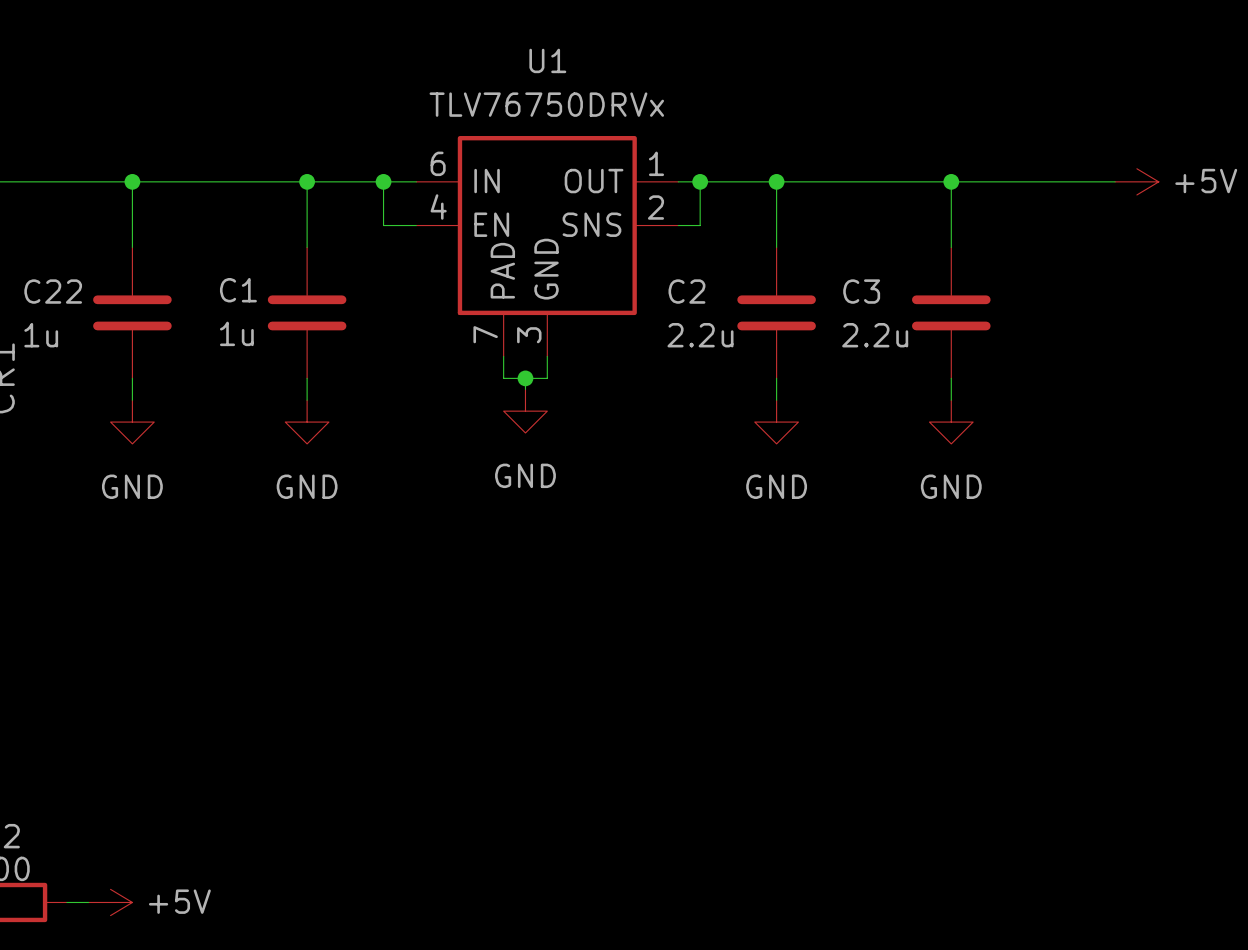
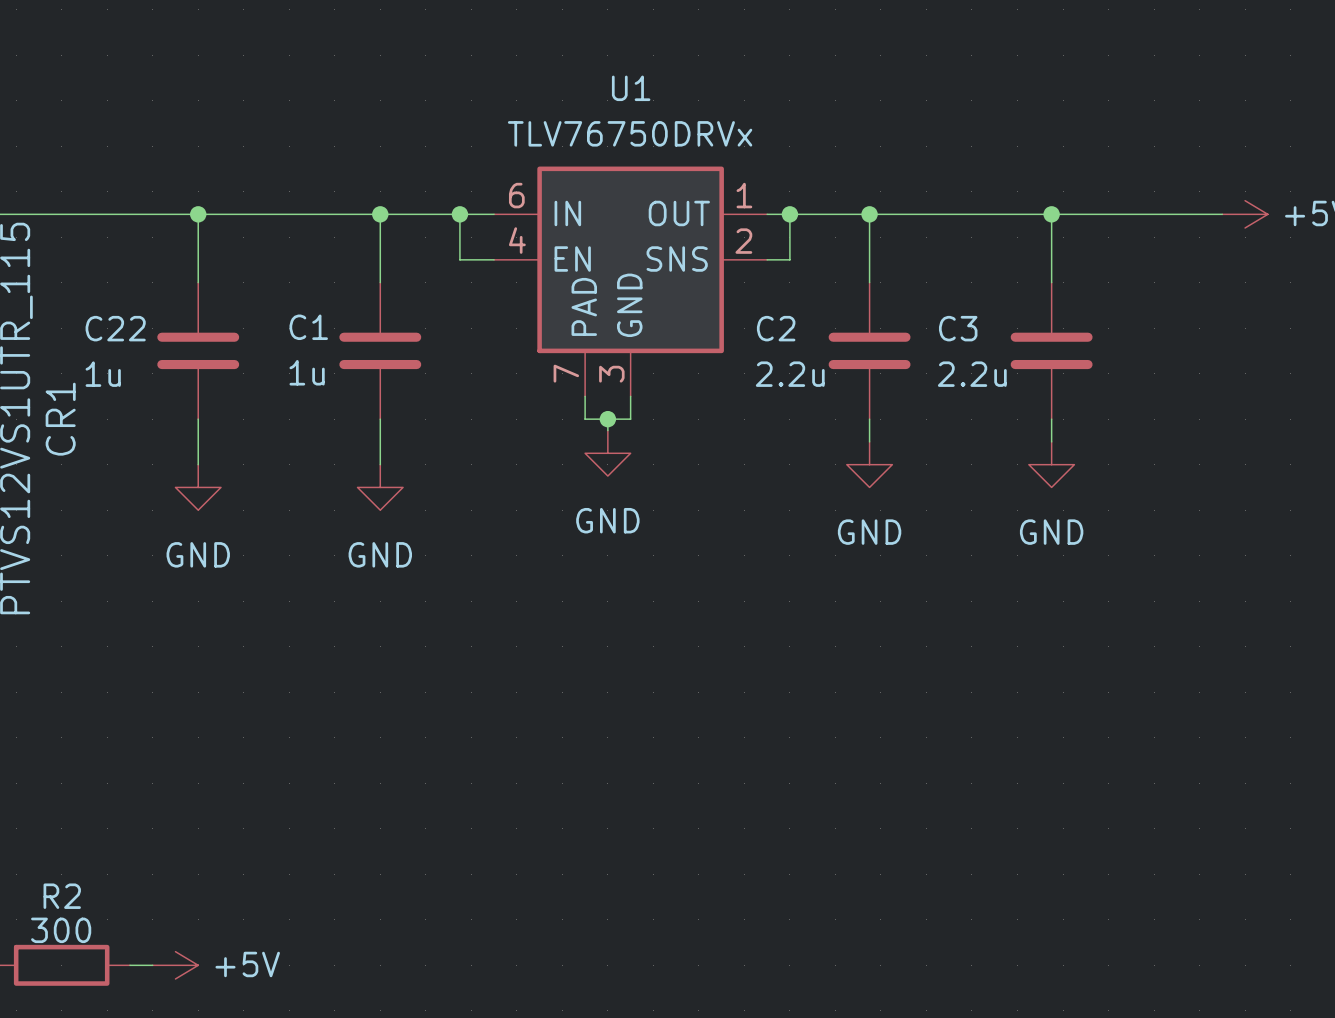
power symbol position: GND (132, 422) -> GND (198, 487)
power symbol position: GND (307, 422) -> GND (380, 487)

